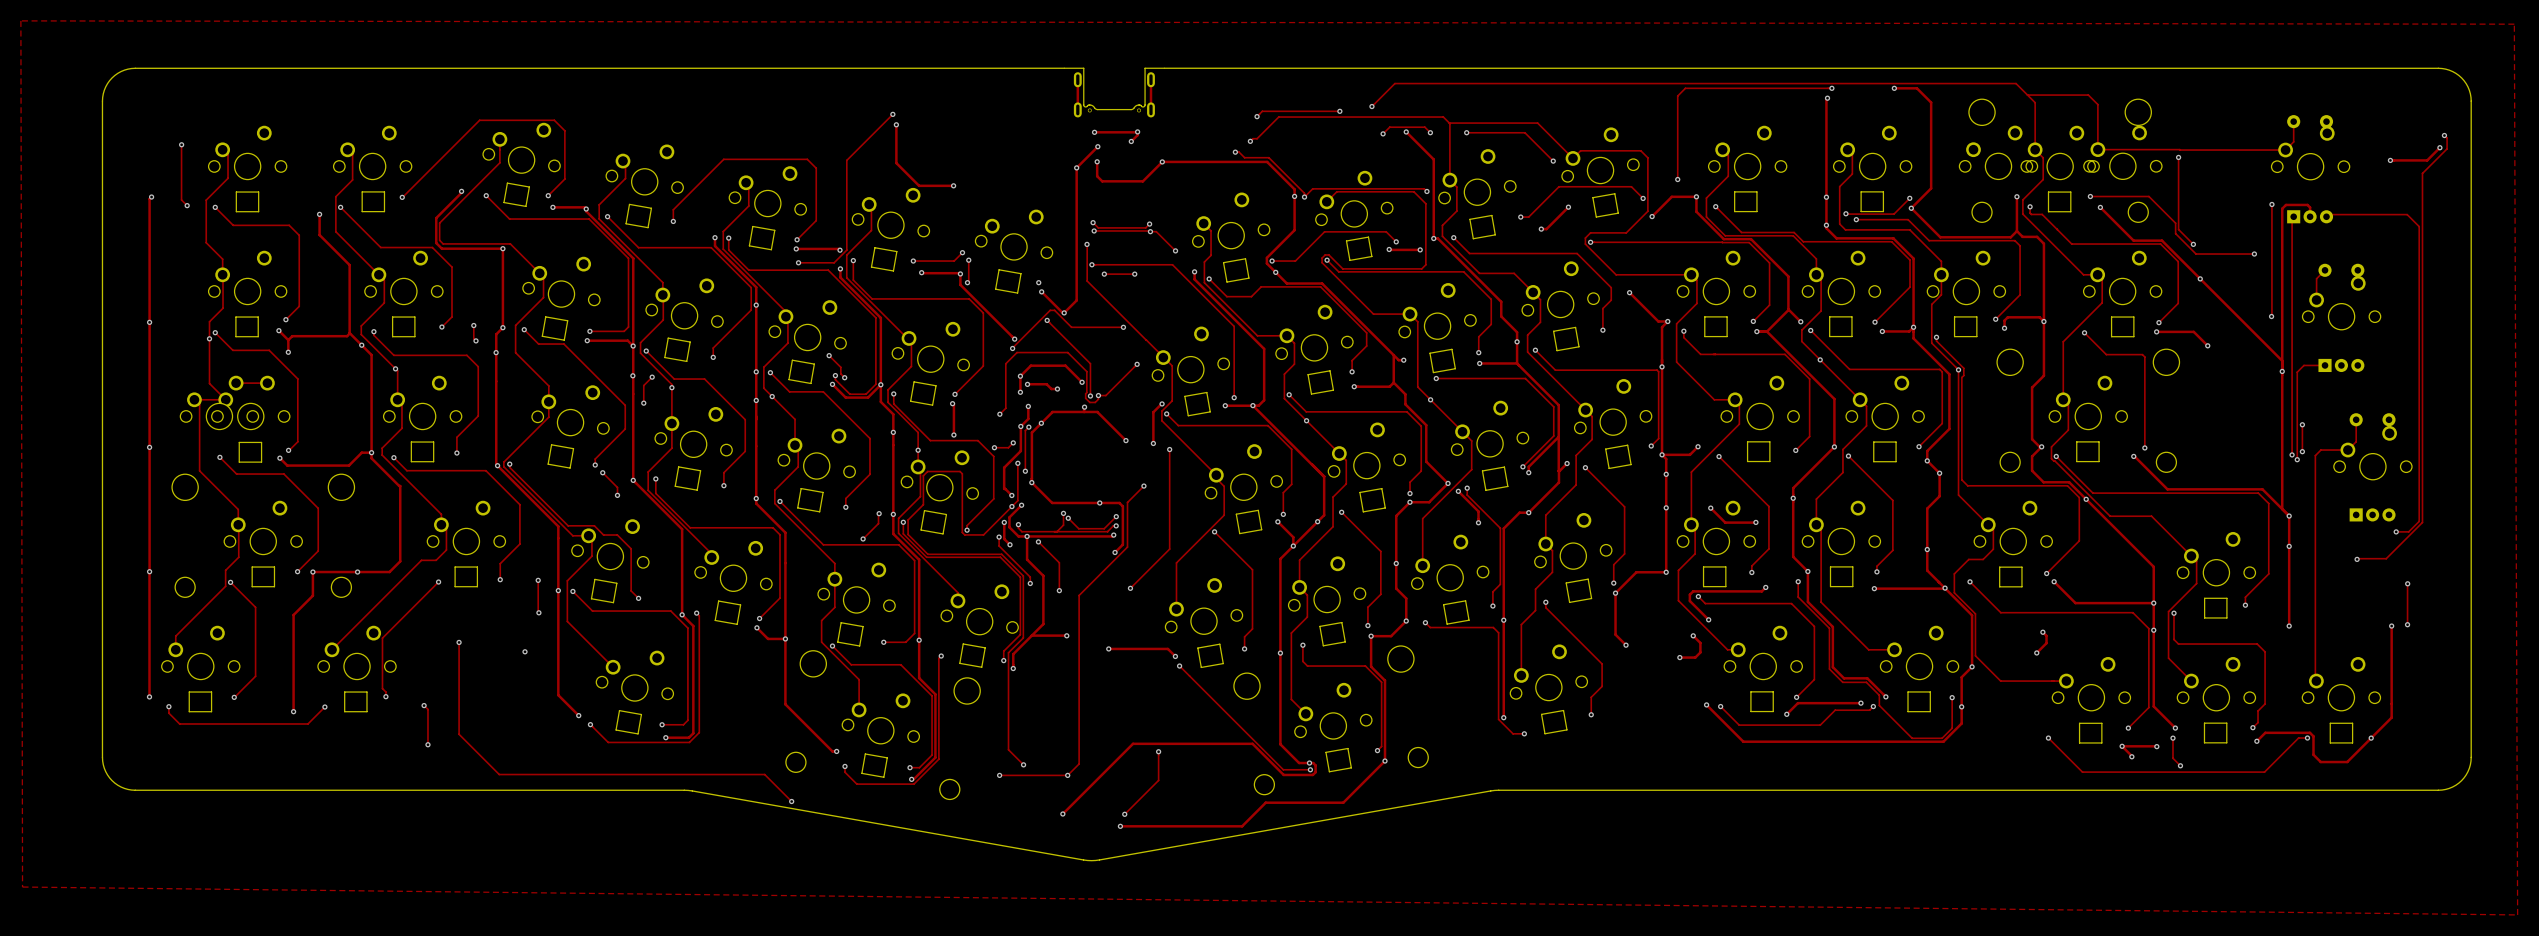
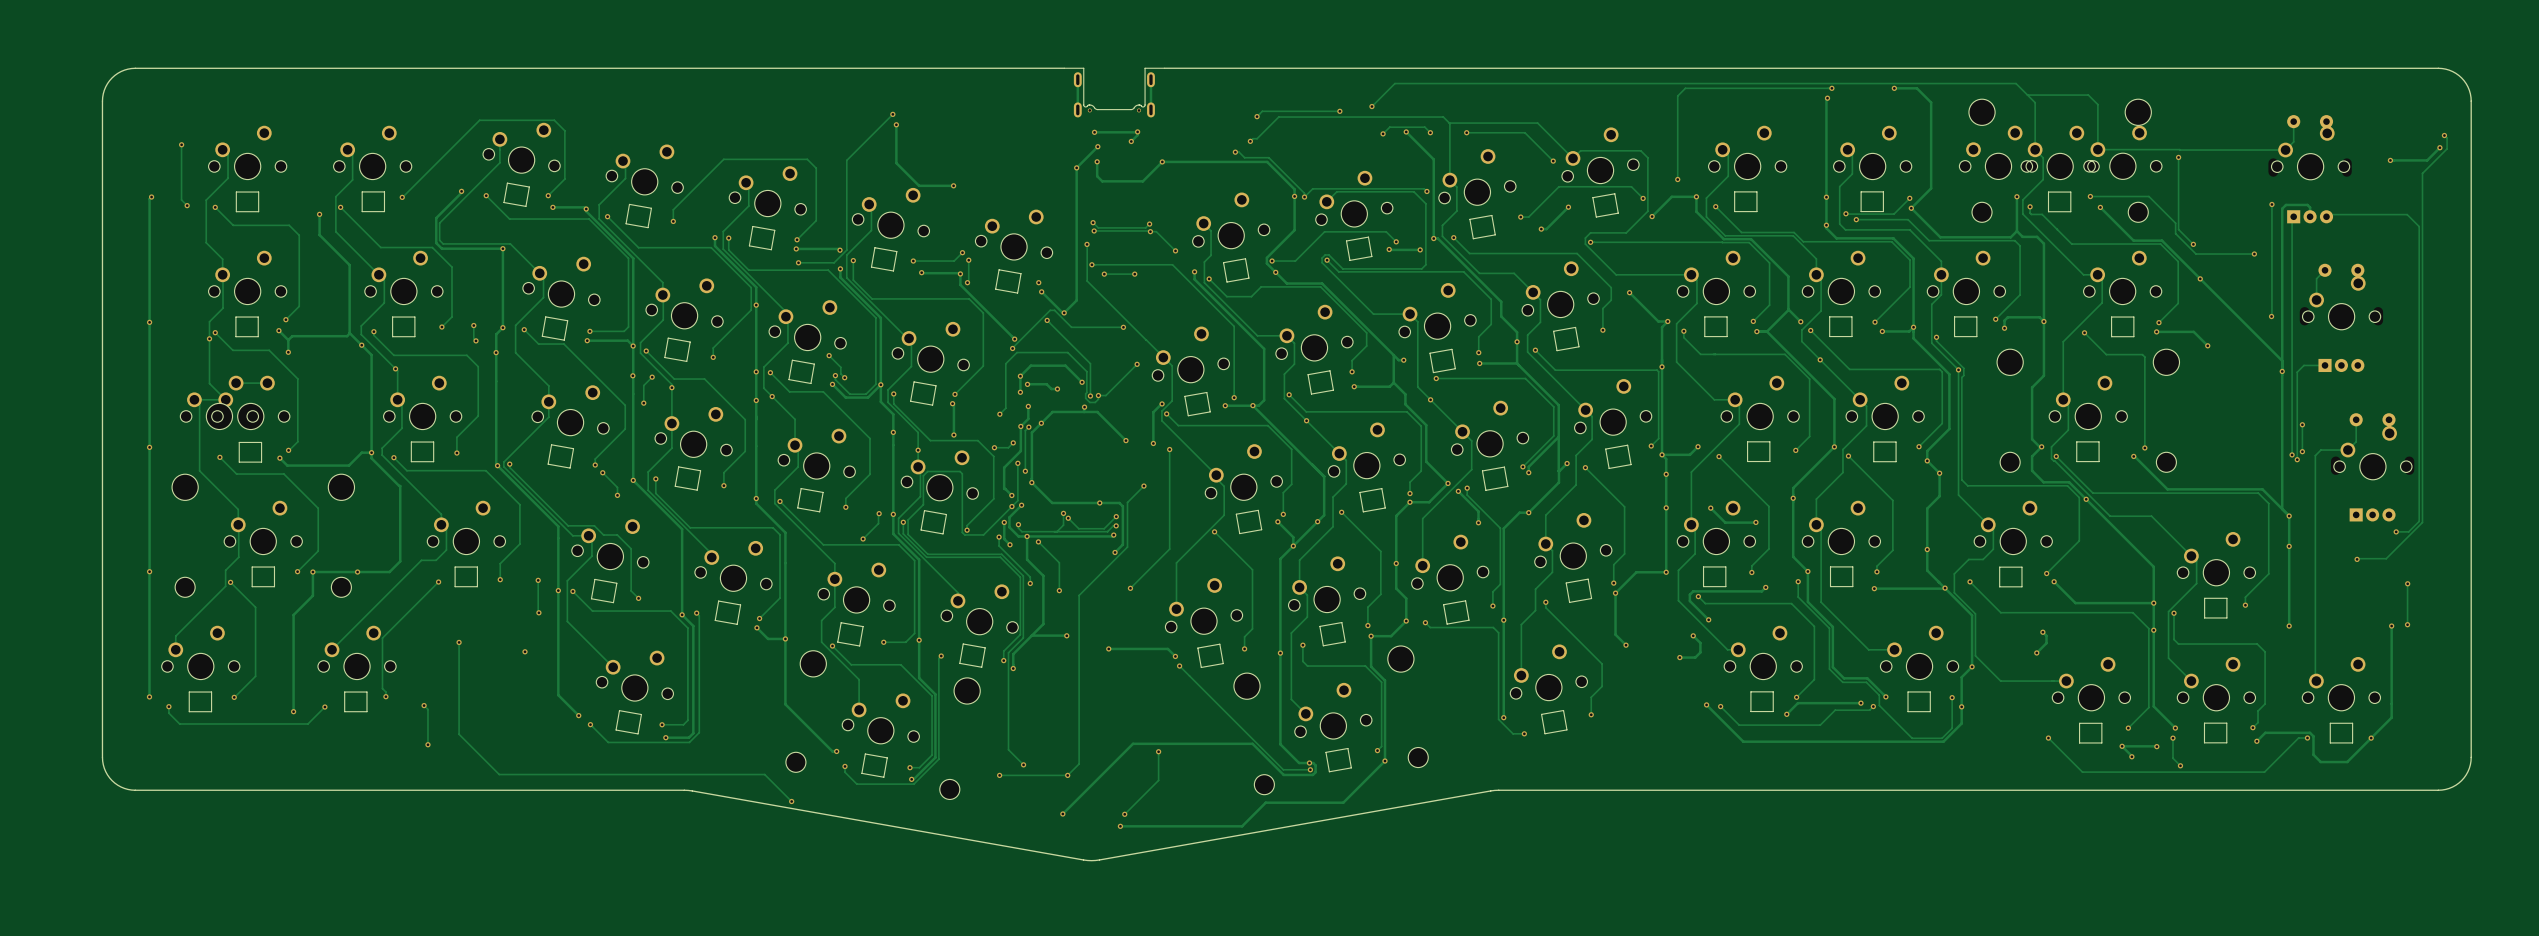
zone outline: (20, 20) (22, 887) (2517, 914) (2514, 24) (20, 20) -> none

